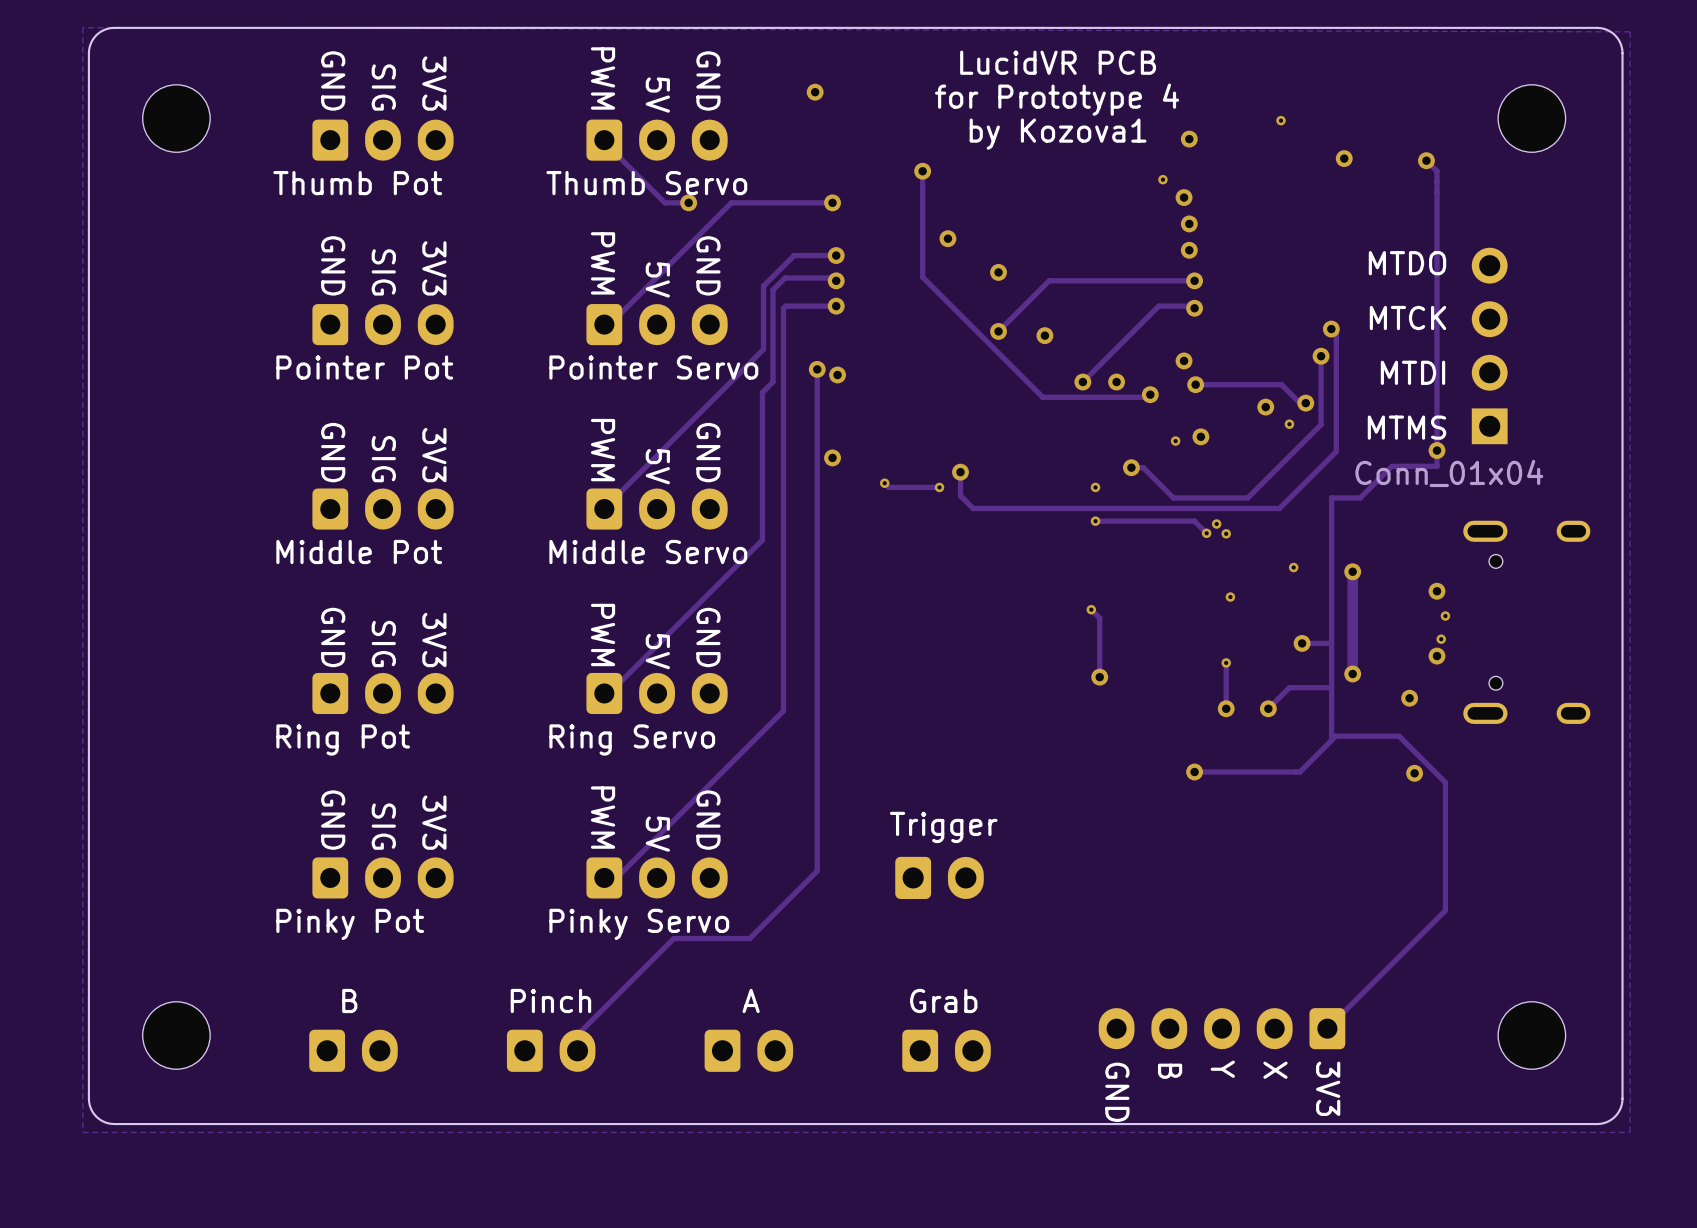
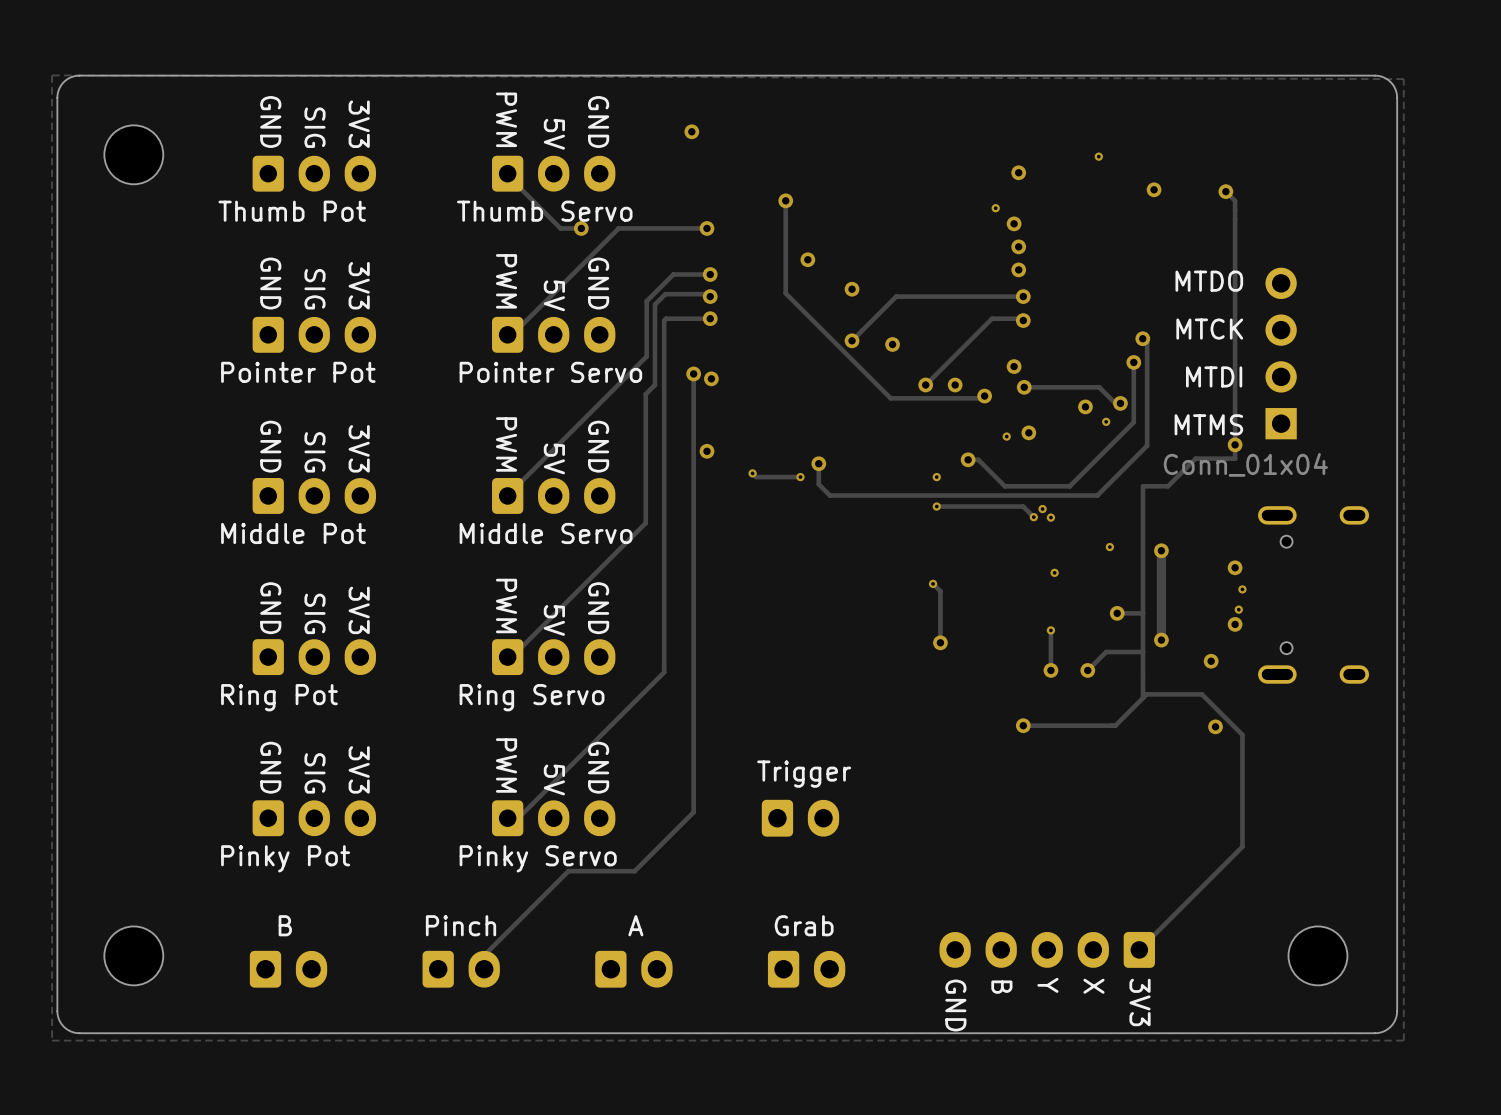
text: LucidVR PCB (1058, 62) -> none
text: for Prototype 4 (1057, 99) -> none
part: (1531, 118) -> none
text: by Kozova1 (1058, 134) -> none

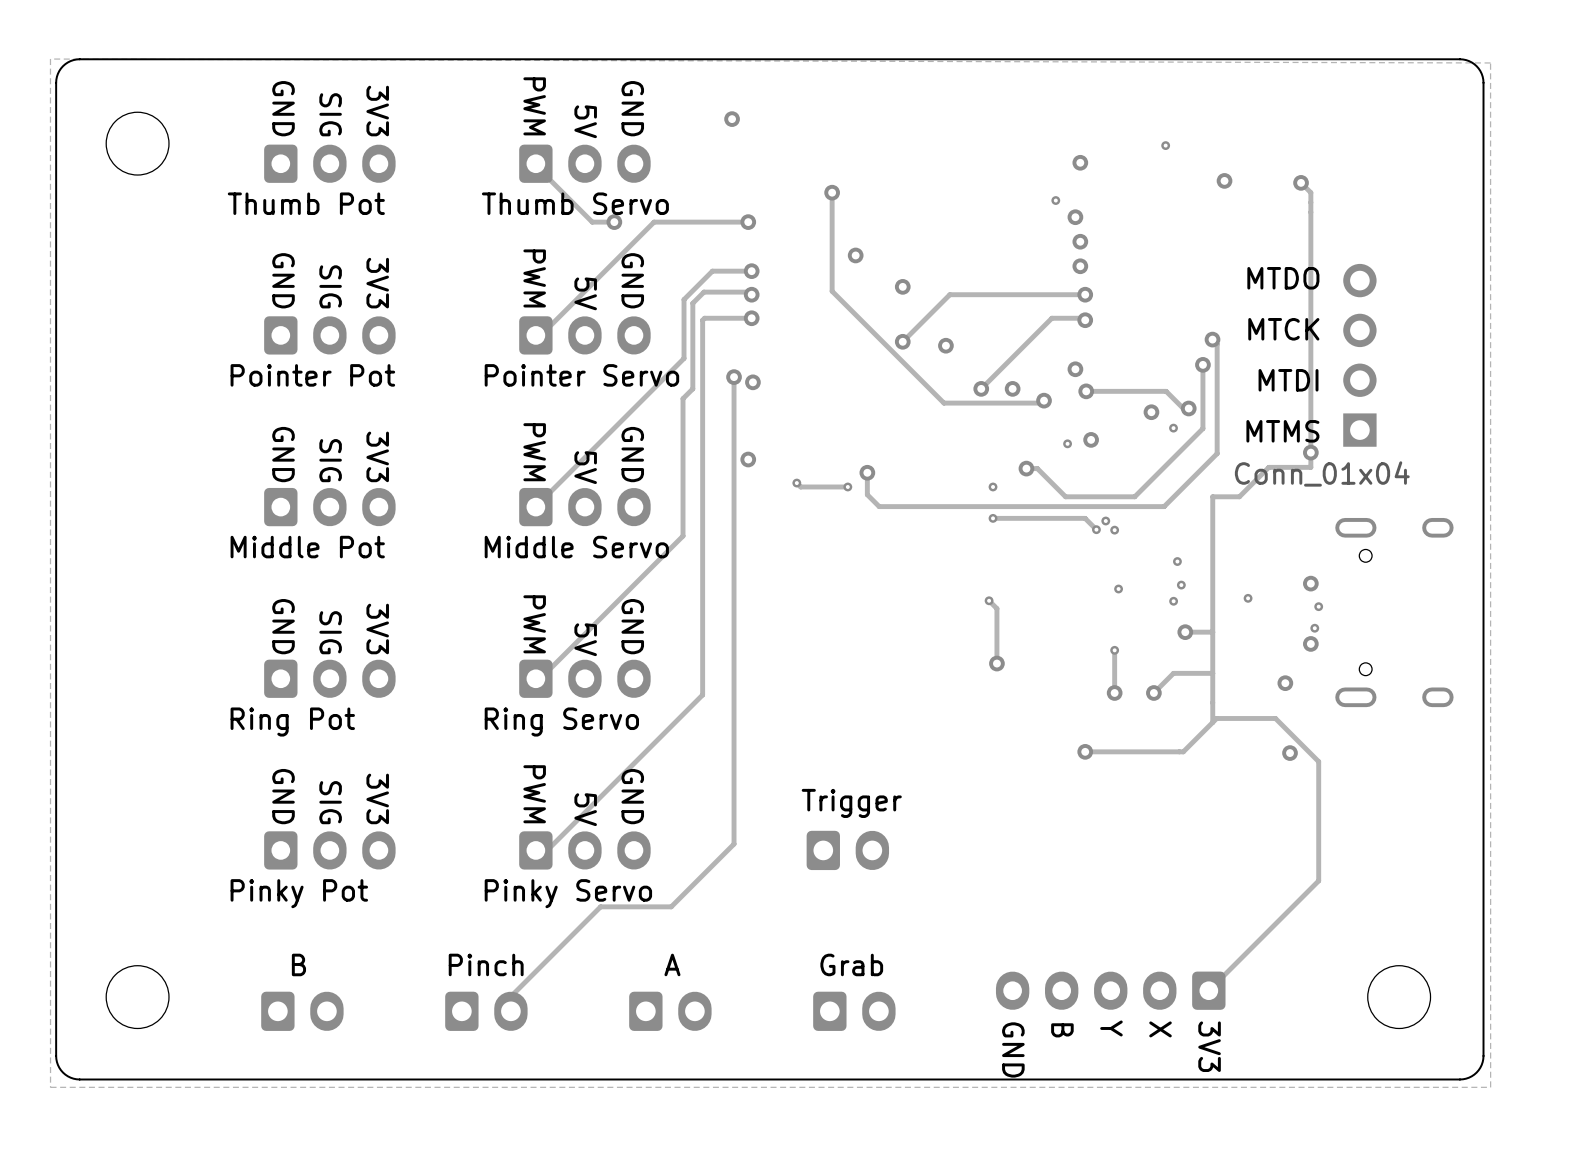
track: (1161, 550) (1161, 640) -> none
via: (1161, 550) -> none
via: none -> (1181, 585)
via: none -> (1248, 598)
via: none -> (1173, 601)
via: (1161, 640) -> none

